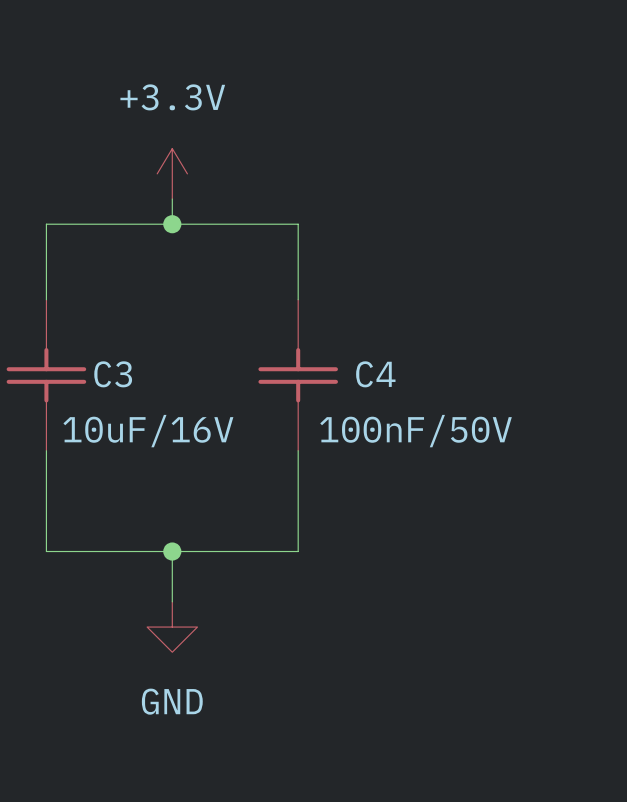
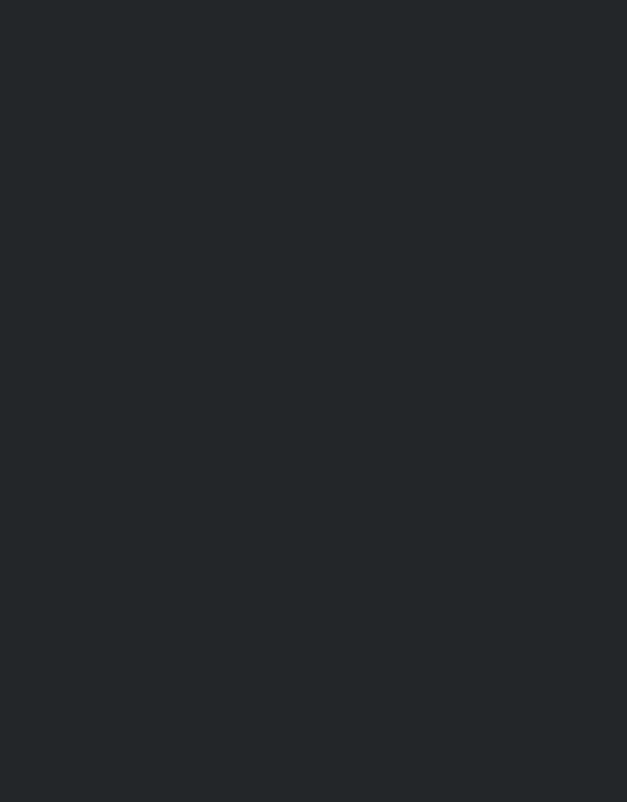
power symbol: +3.3V (172, 173) -> none
wire: (172, 199) (172, 224) -> none
junction: (172, 224) -> none
wire: (46, 299) (46, 224) (298, 224) (298, 299) -> none
C3: 10uF/16V (46, 375) -> none
C4: 100nF/50V (298, 375) -> none
wire: (46, 450) (46, 551) (298, 551) (298, 450) -> none
wire: (172, 551) (172, 601) -> none
junction: (172, 551) -> none
power symbol: GND (172, 627) -> none

